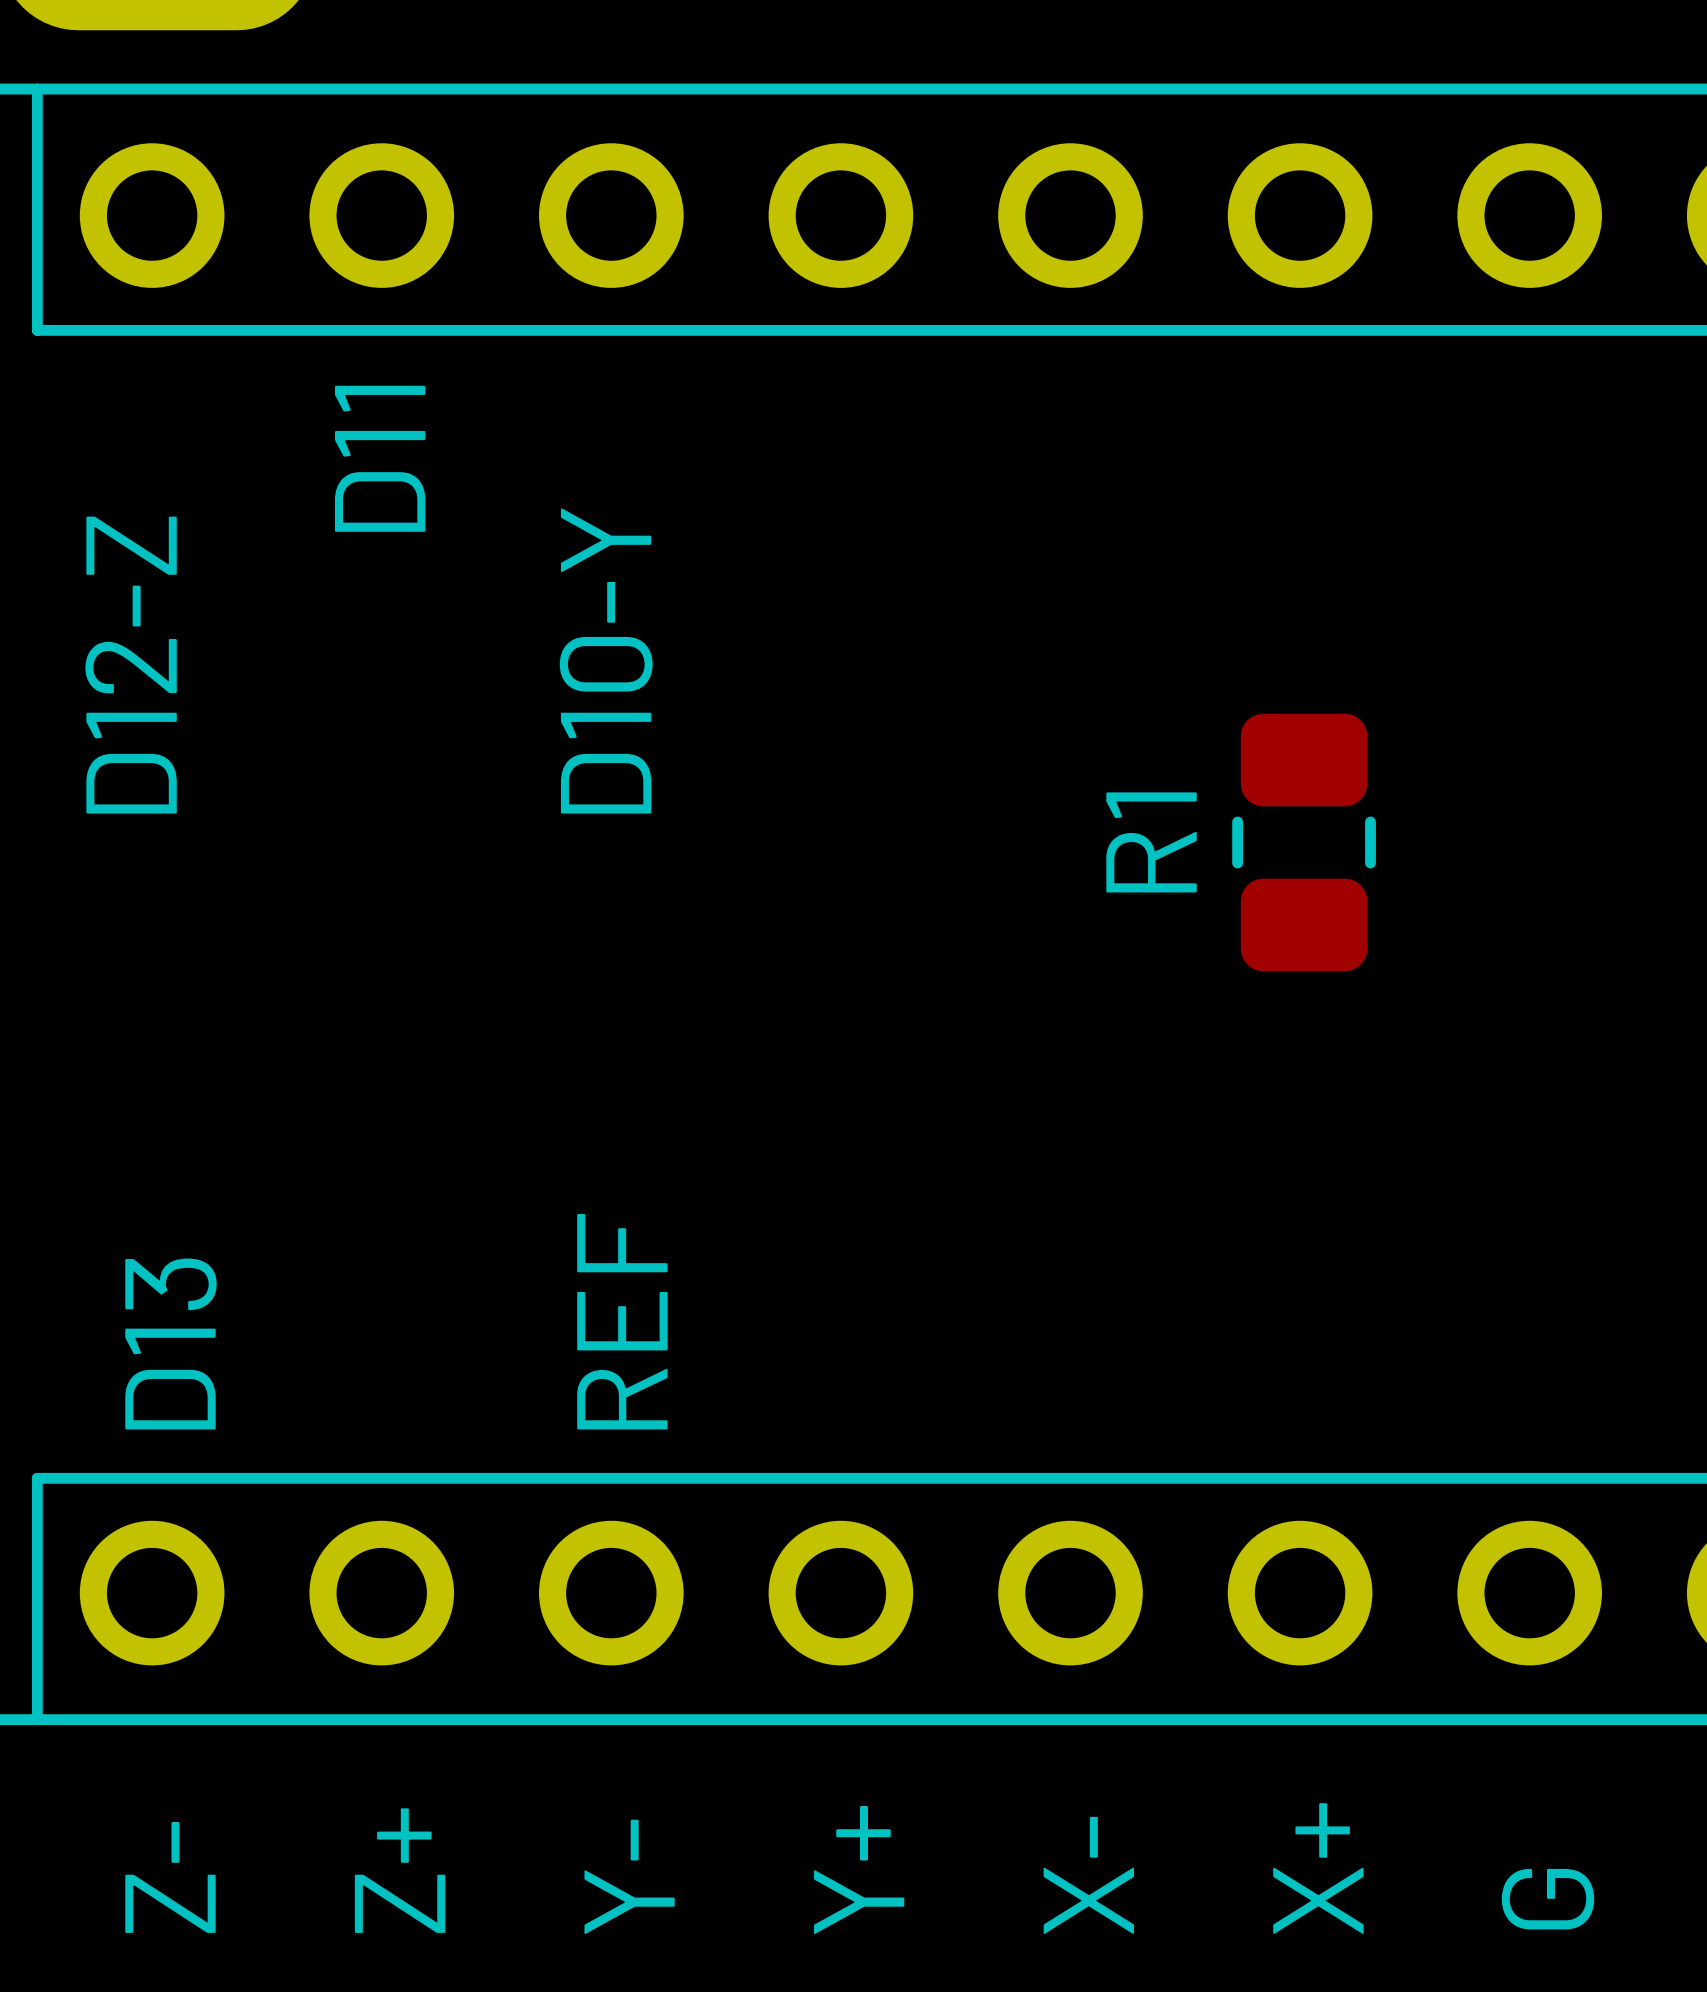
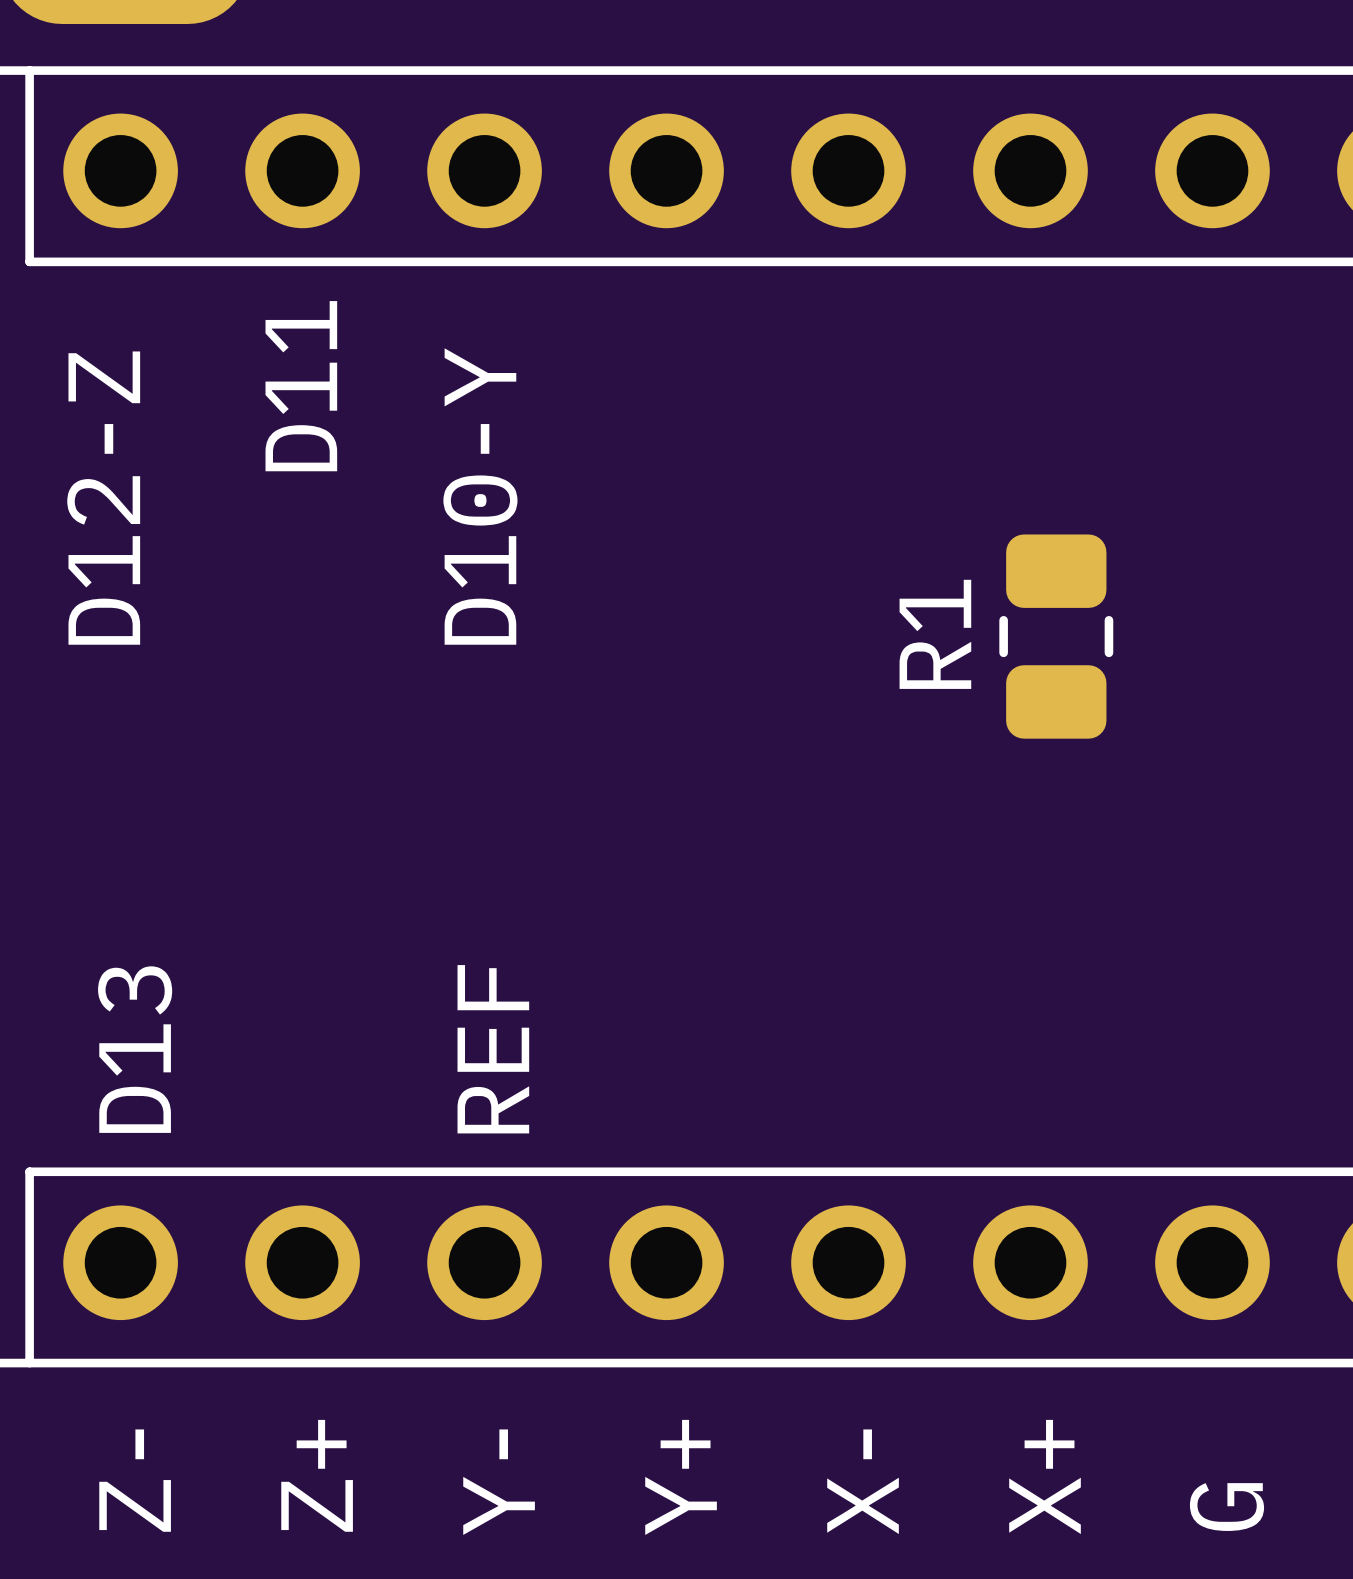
R1 position: (1304, 842) -> (1056, 636)

